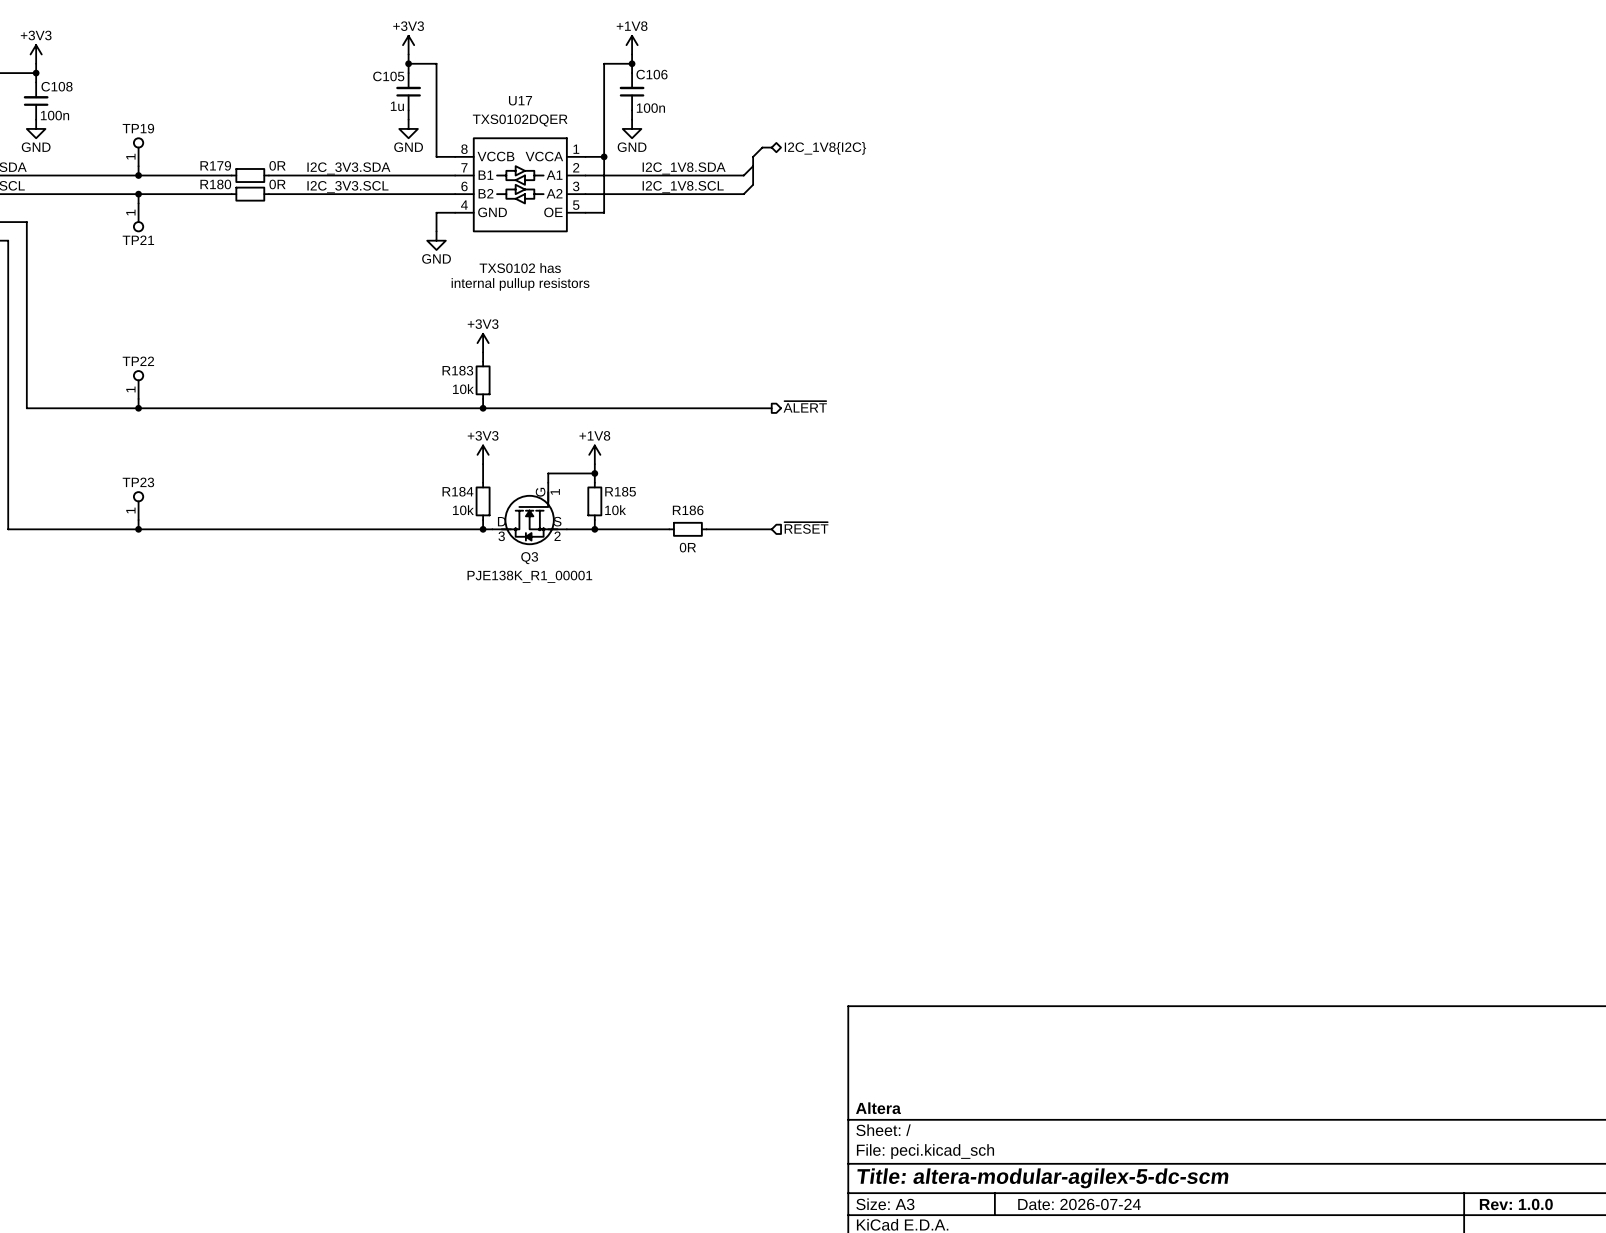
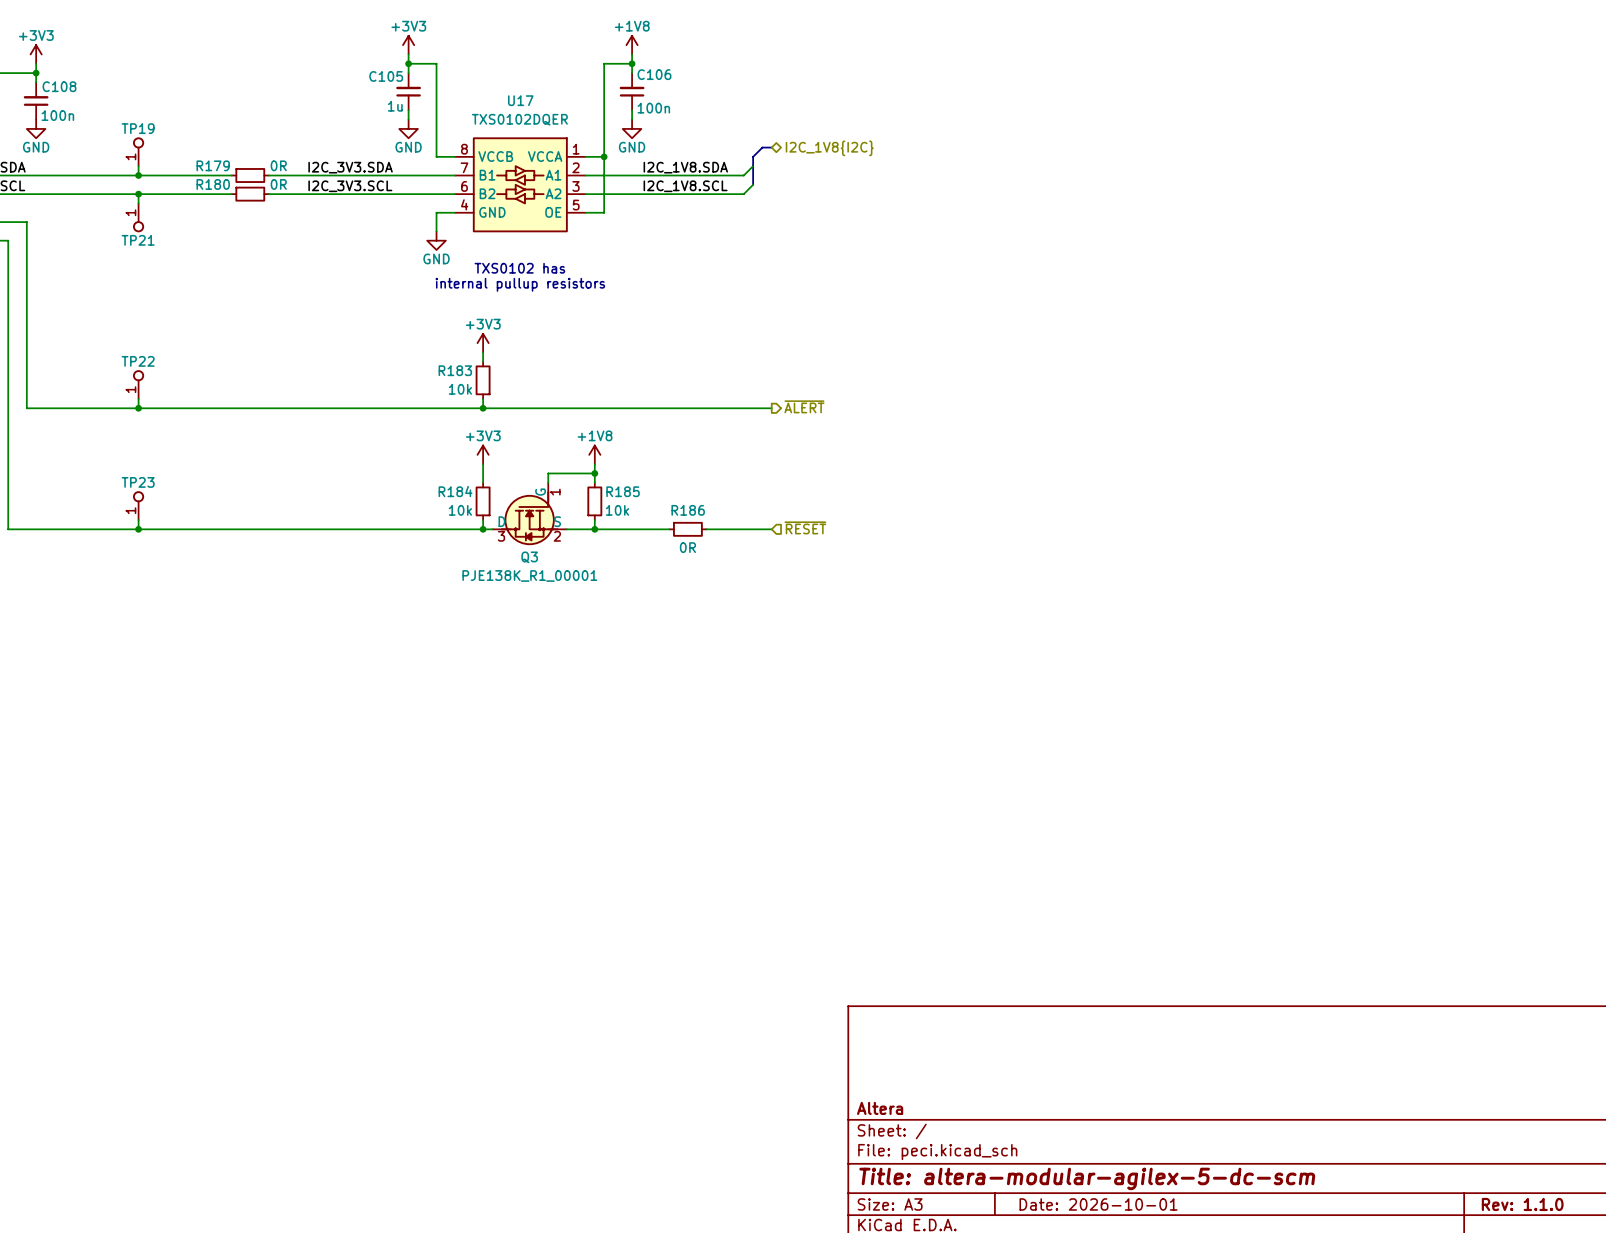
title block: Date: 2026-07-24 (1079, 1204) -> Date: 2026-10-01 (1098, 1204)
title block: Rev: 1.0.0 (1516, 1204) -> Rev: 1.1.0 (1522, 1204)

